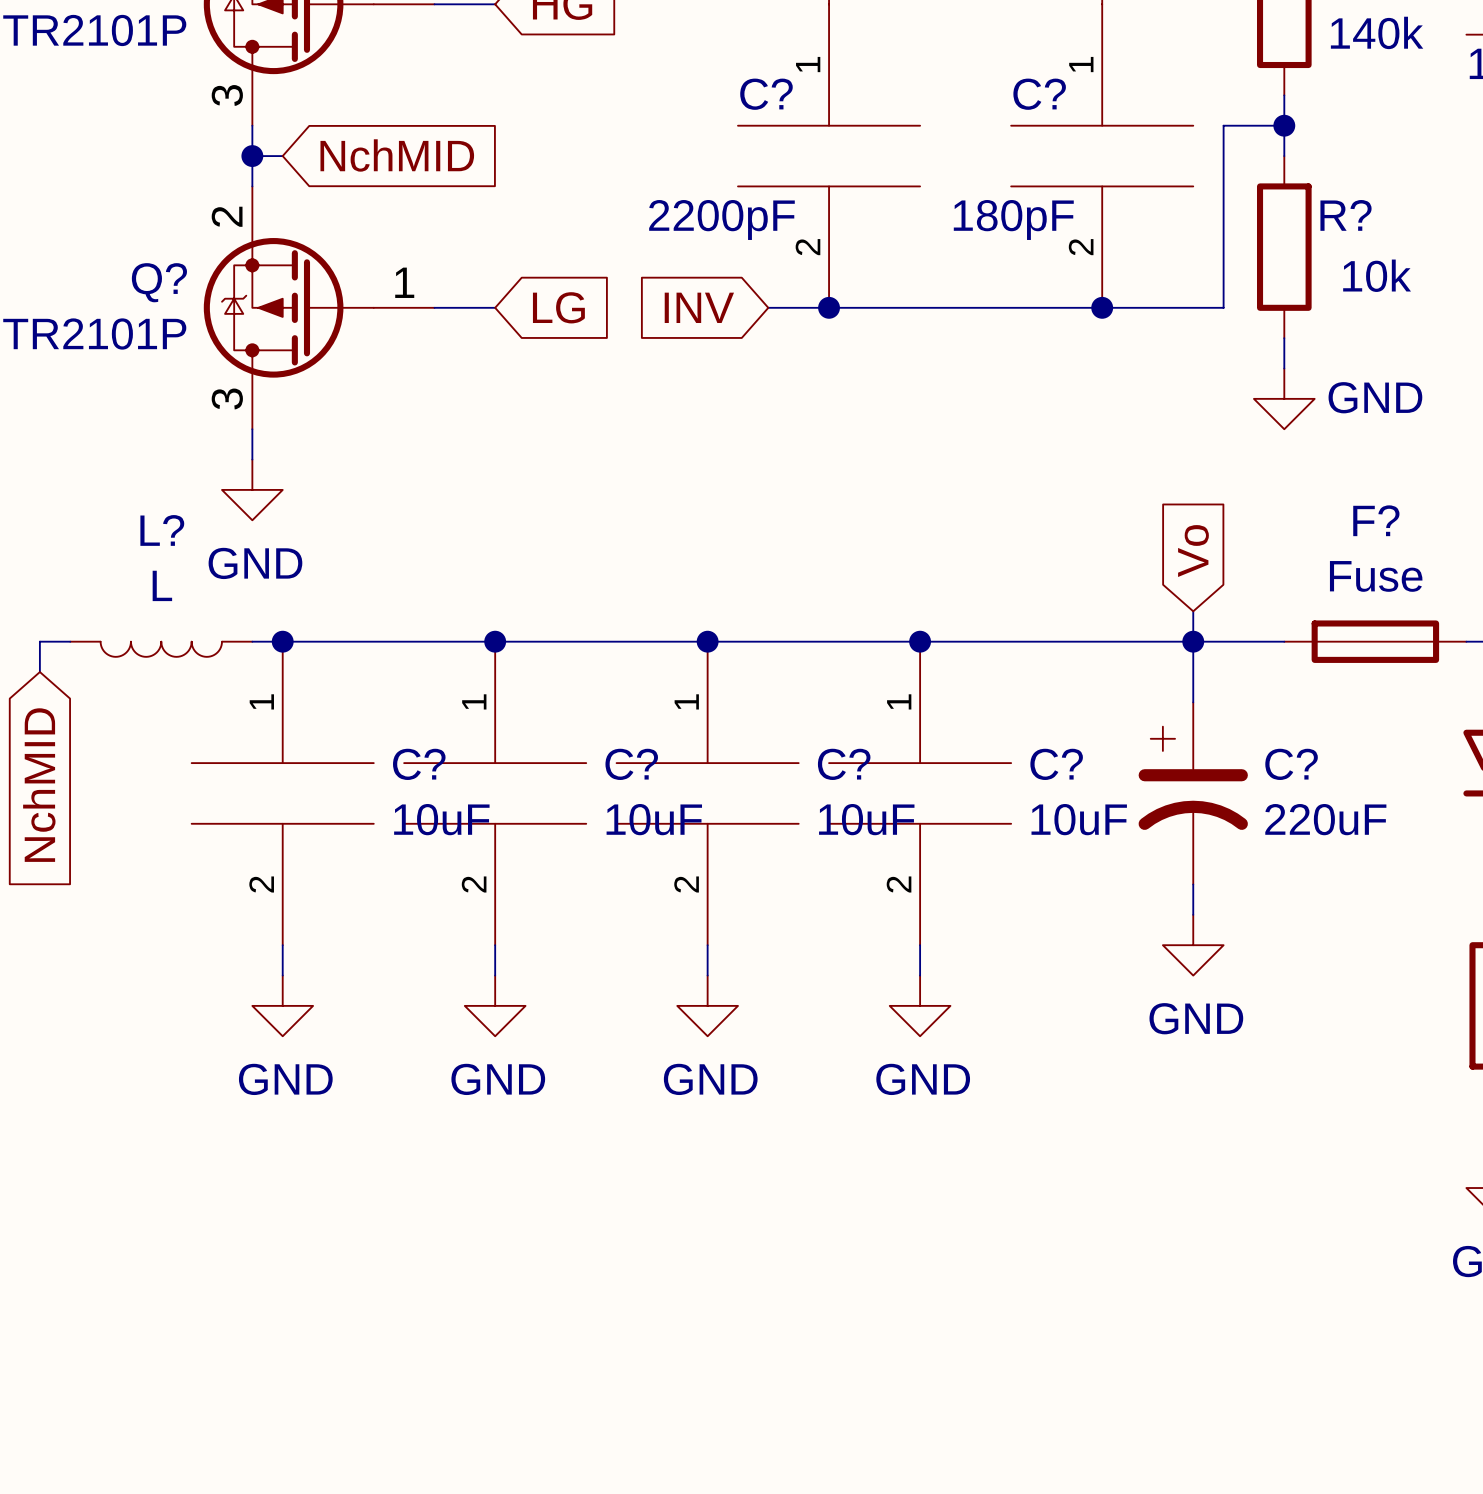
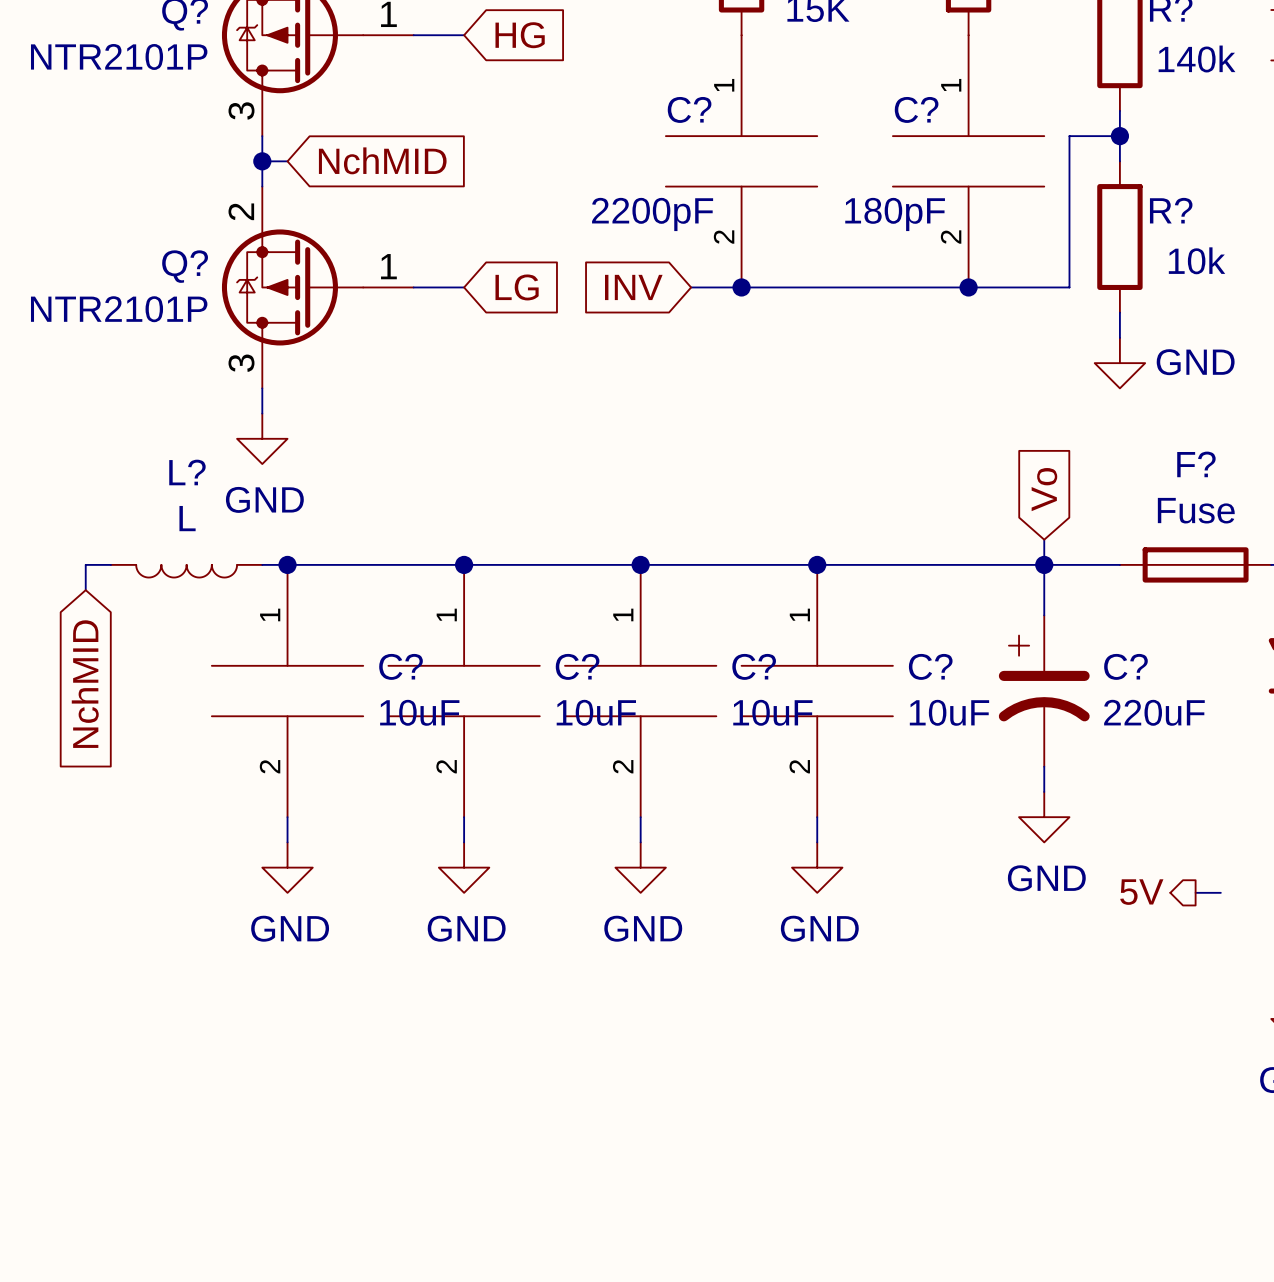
hierarchical label: none -> 5V (1141, 892)
wire: none -> (1195, 892) (1220, 892)

